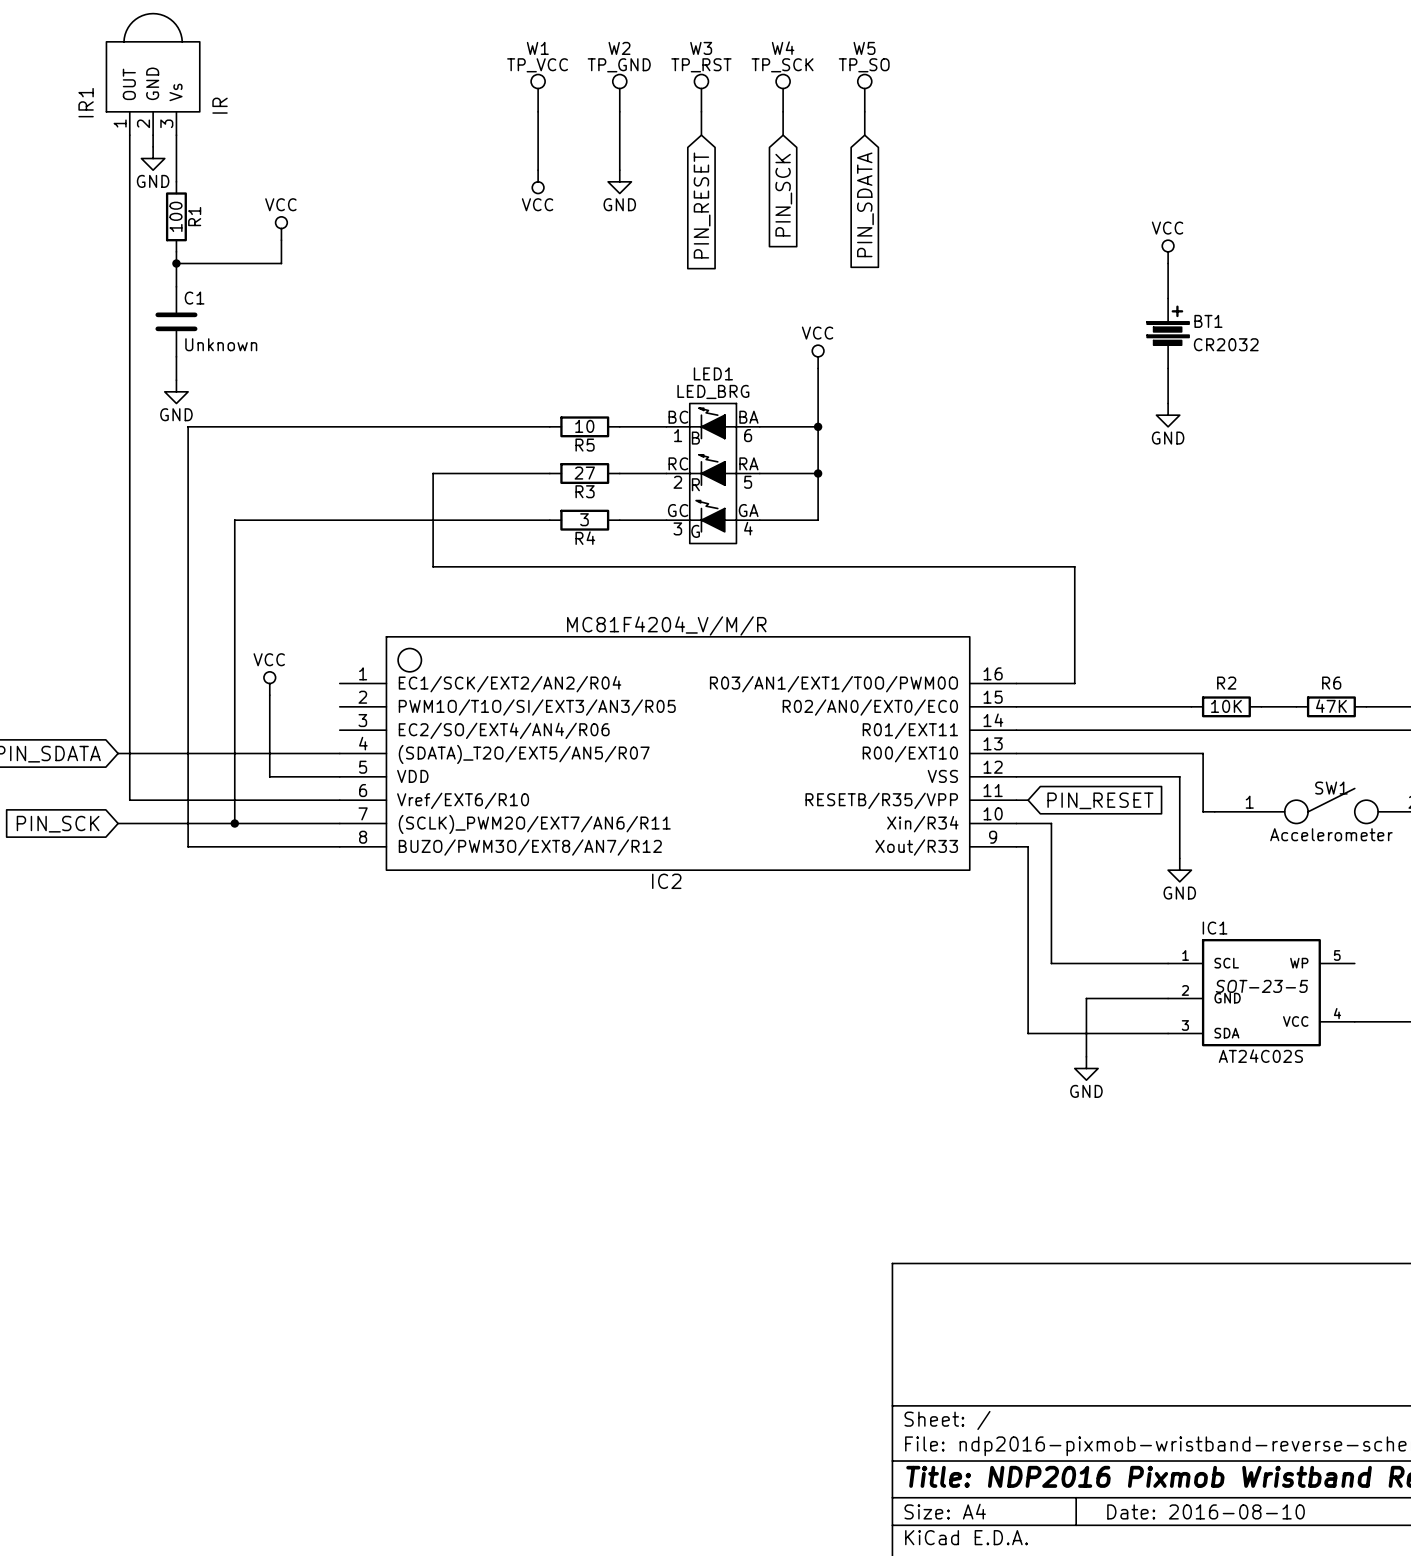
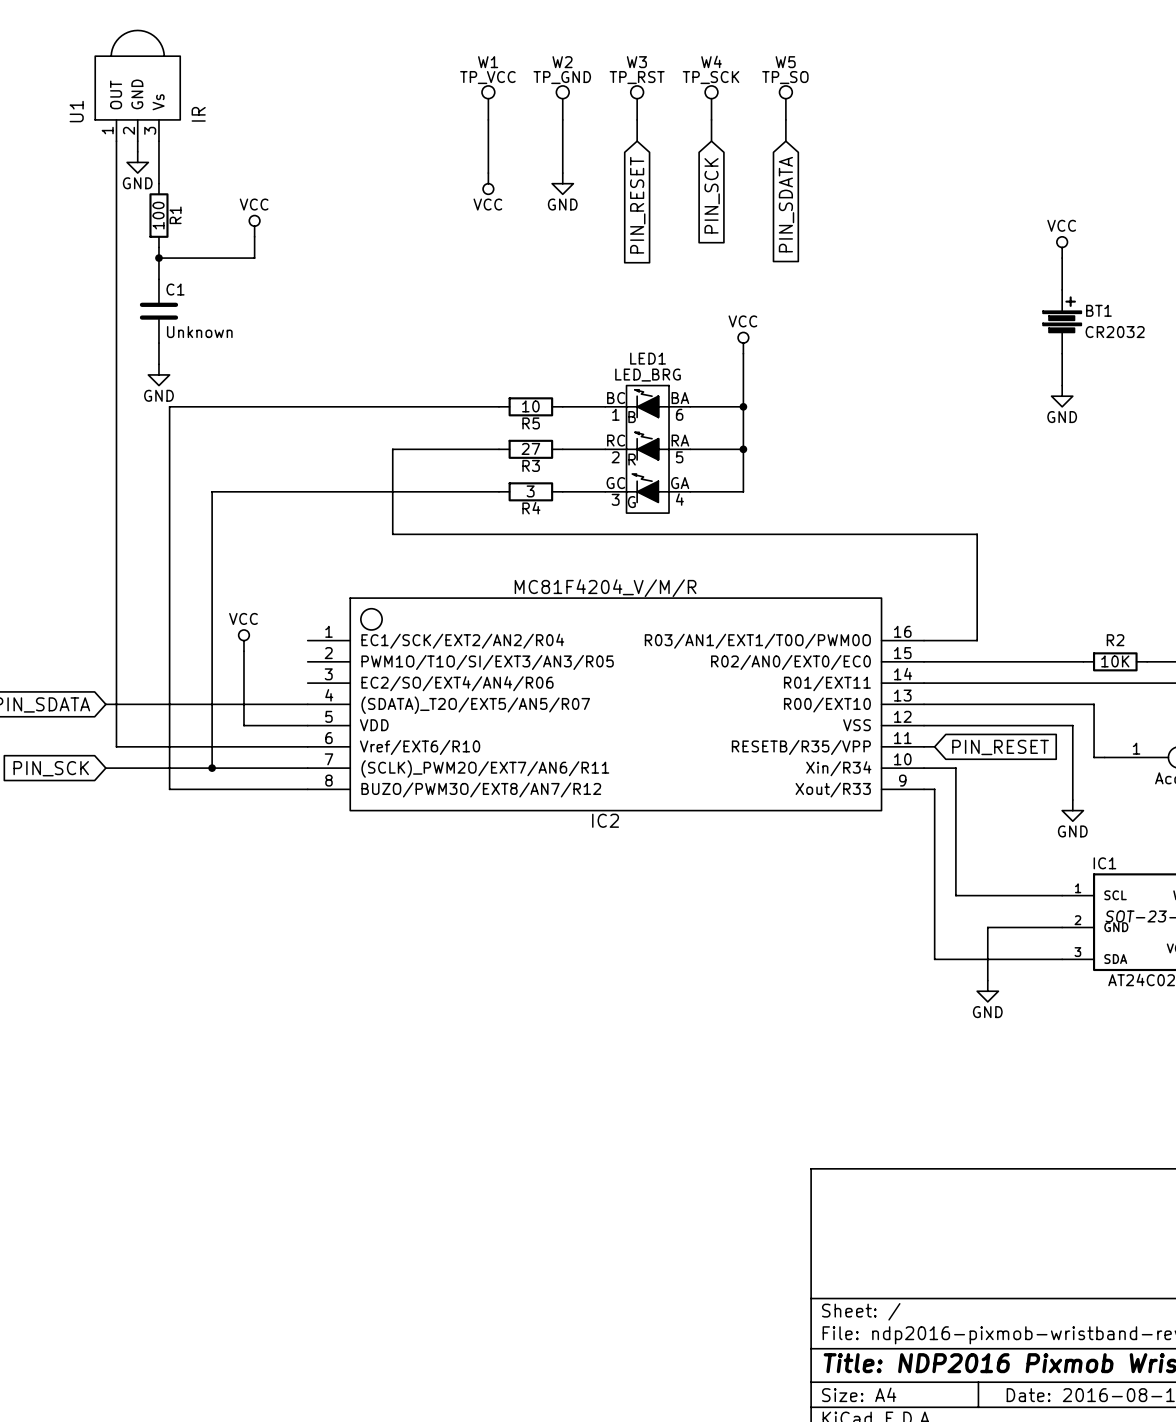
IR1 name: IR1 (86, 102) -> U1 (76, 111)

